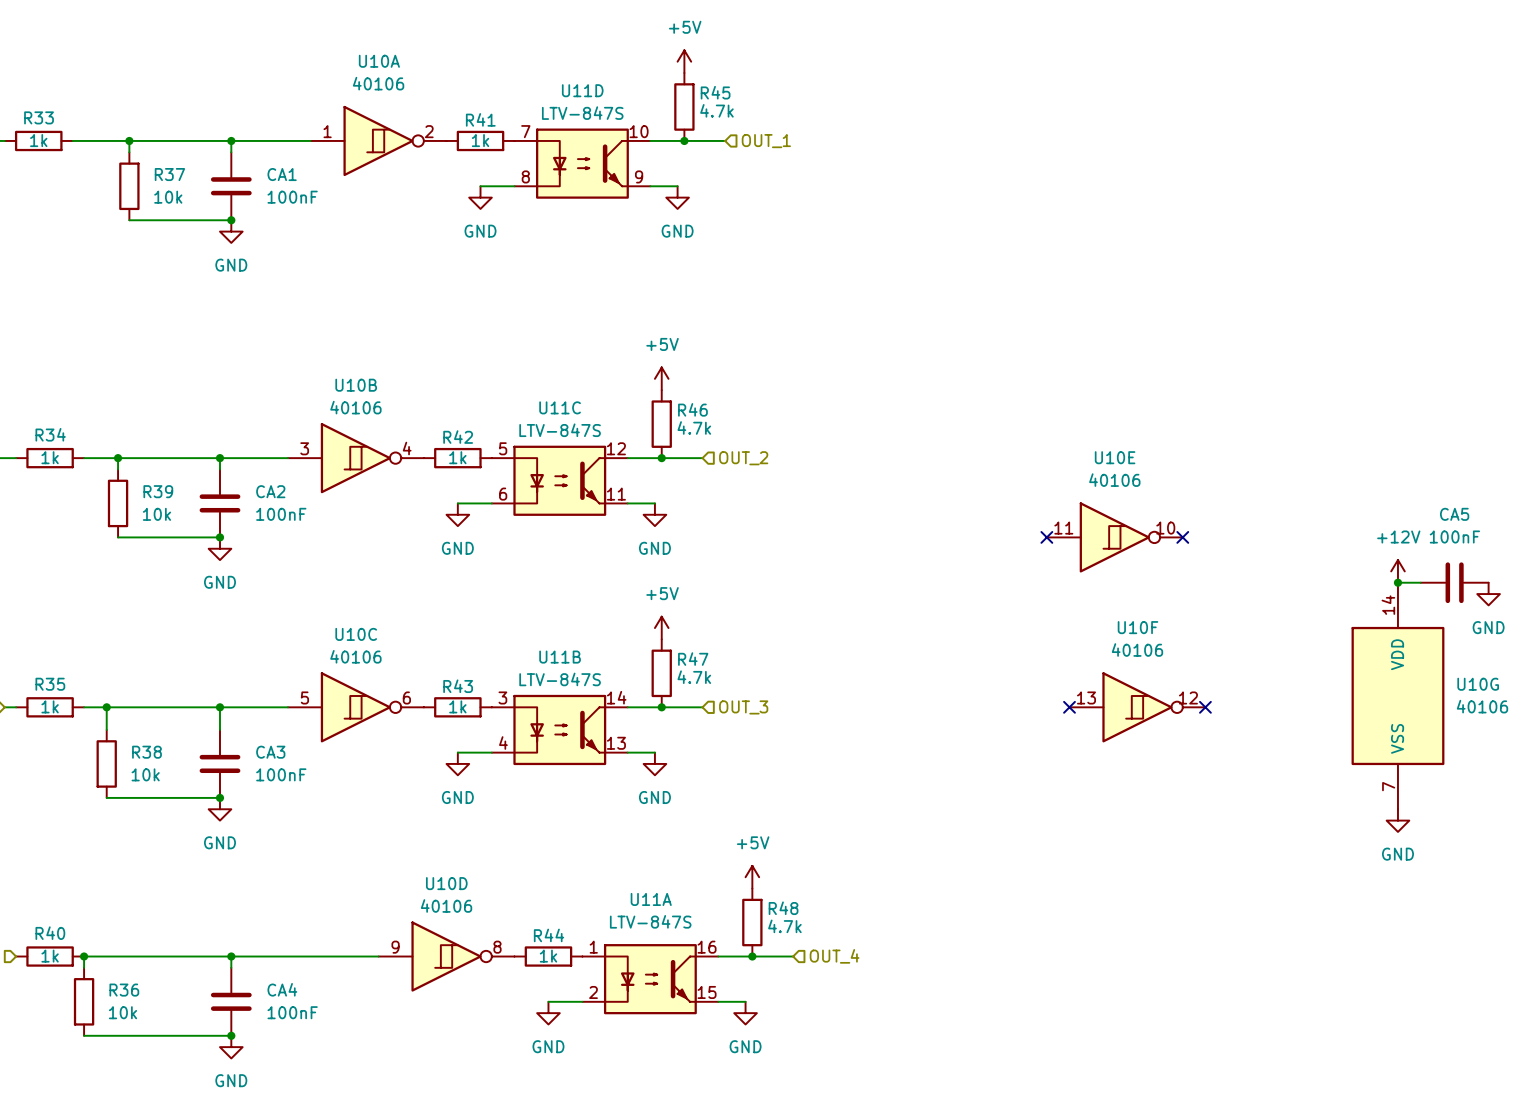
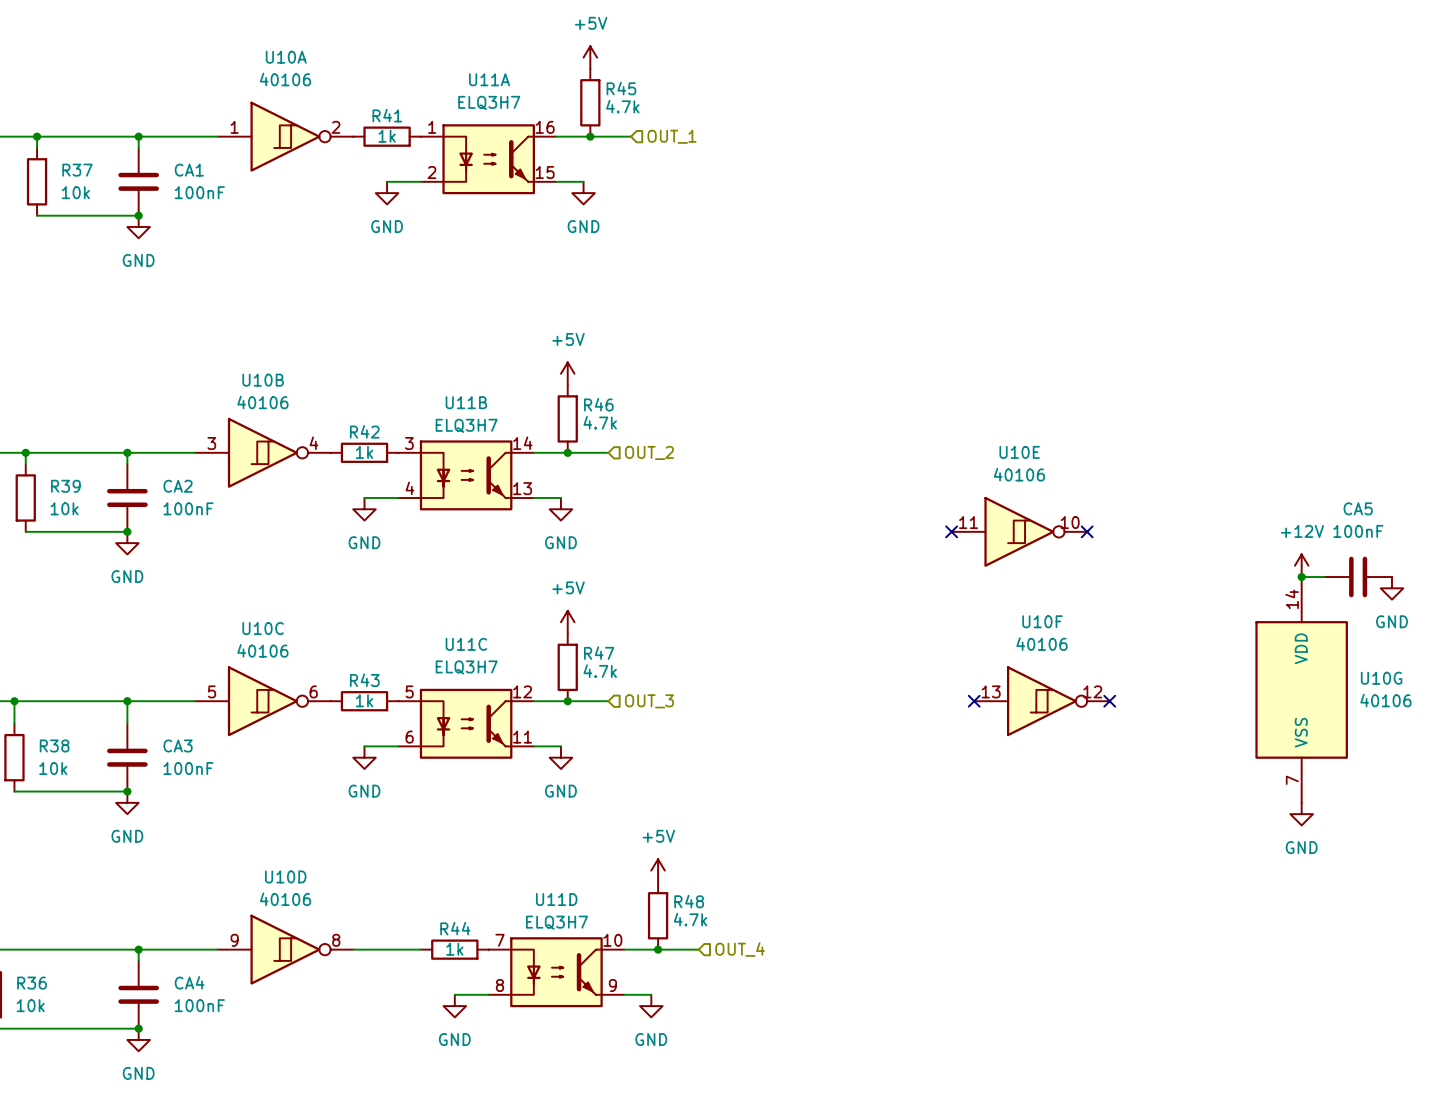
U11D value: LTV-847S (582, 113) -> ELQ3H7 (556, 922)
U11D position: (582, 163) -> (556, 972)
U11C name position: U11C (560, 407) -> U11C (466, 644)
U11C value: LTV-847S (560, 430) -> ELQ3H7 (466, 667)
U11C position: (559, 480) -> (466, 723)
U11B value: LTV-847S (560, 679) -> ELQ3H7 (466, 425)
U11B position: (559, 729) -> (466, 475)
U11A value: LTV-847S (650, 921) -> ELQ3H7 (489, 102)
U10D position: (446, 956) -> (285, 949)
U11A position: (650, 979) -> (488, 159)

